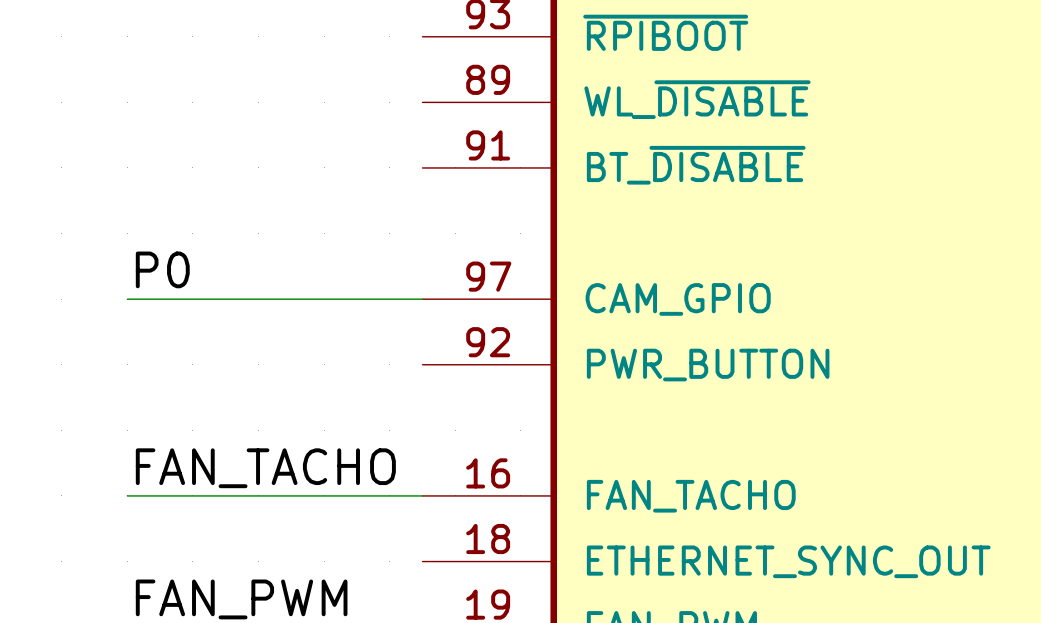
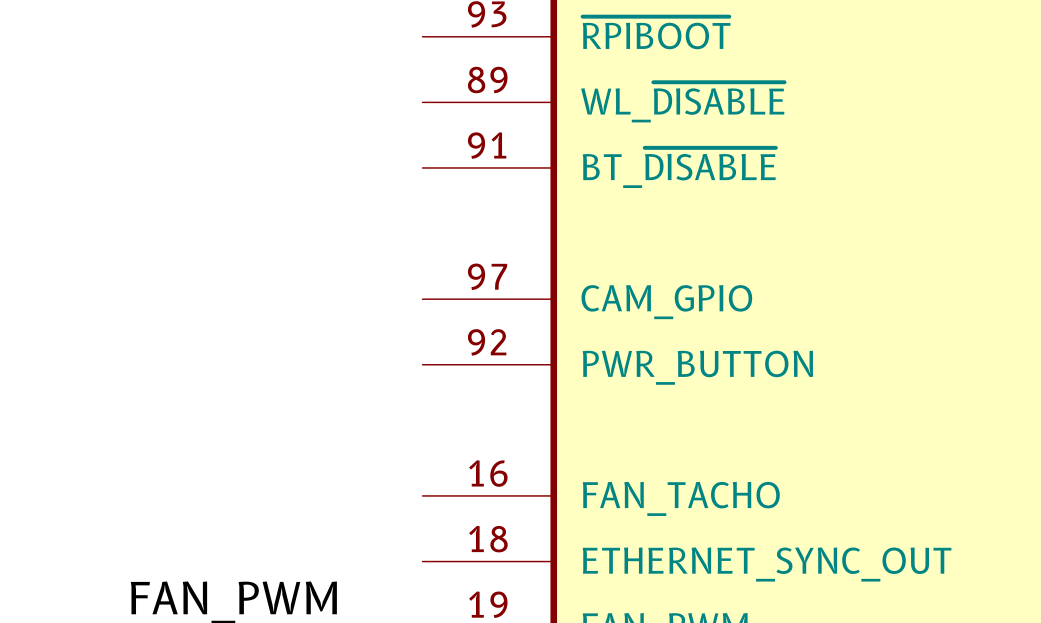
label: P0 (162, 269) -> none
wire: (127, 299) (422, 299) -> none
label: FAN_TACHO (265, 468) -> none
wire: (127, 495) (422, 495) -> none

